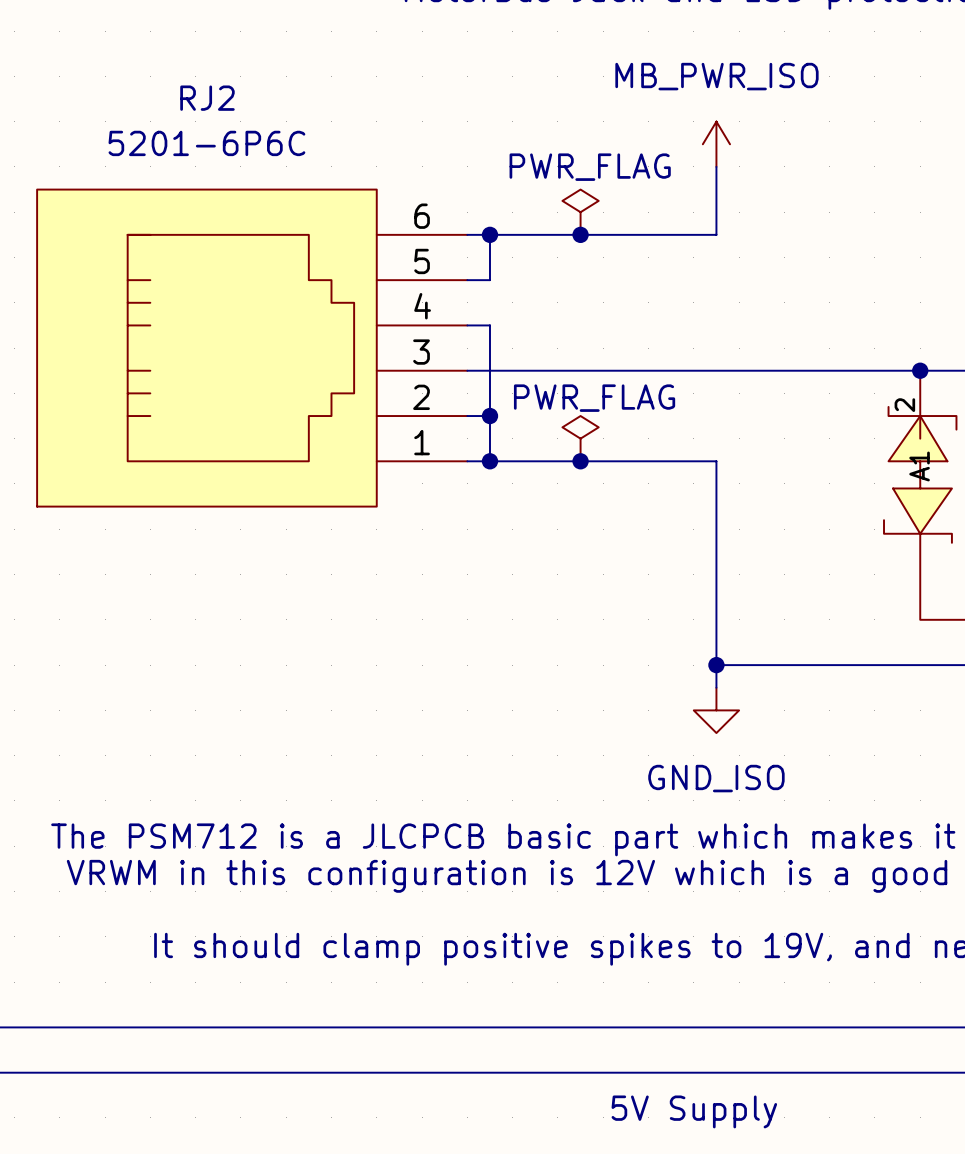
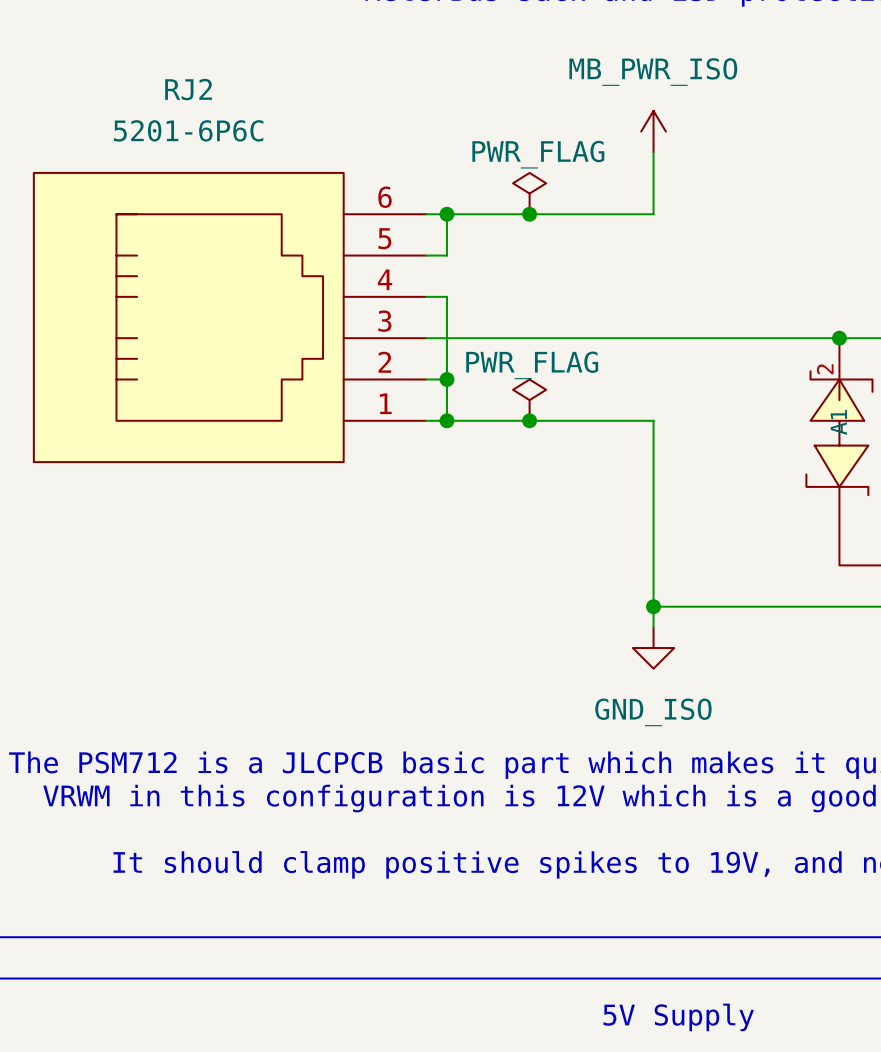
text position: 5V Supply (694, 1111) -> 5V Supply (678, 1017)

